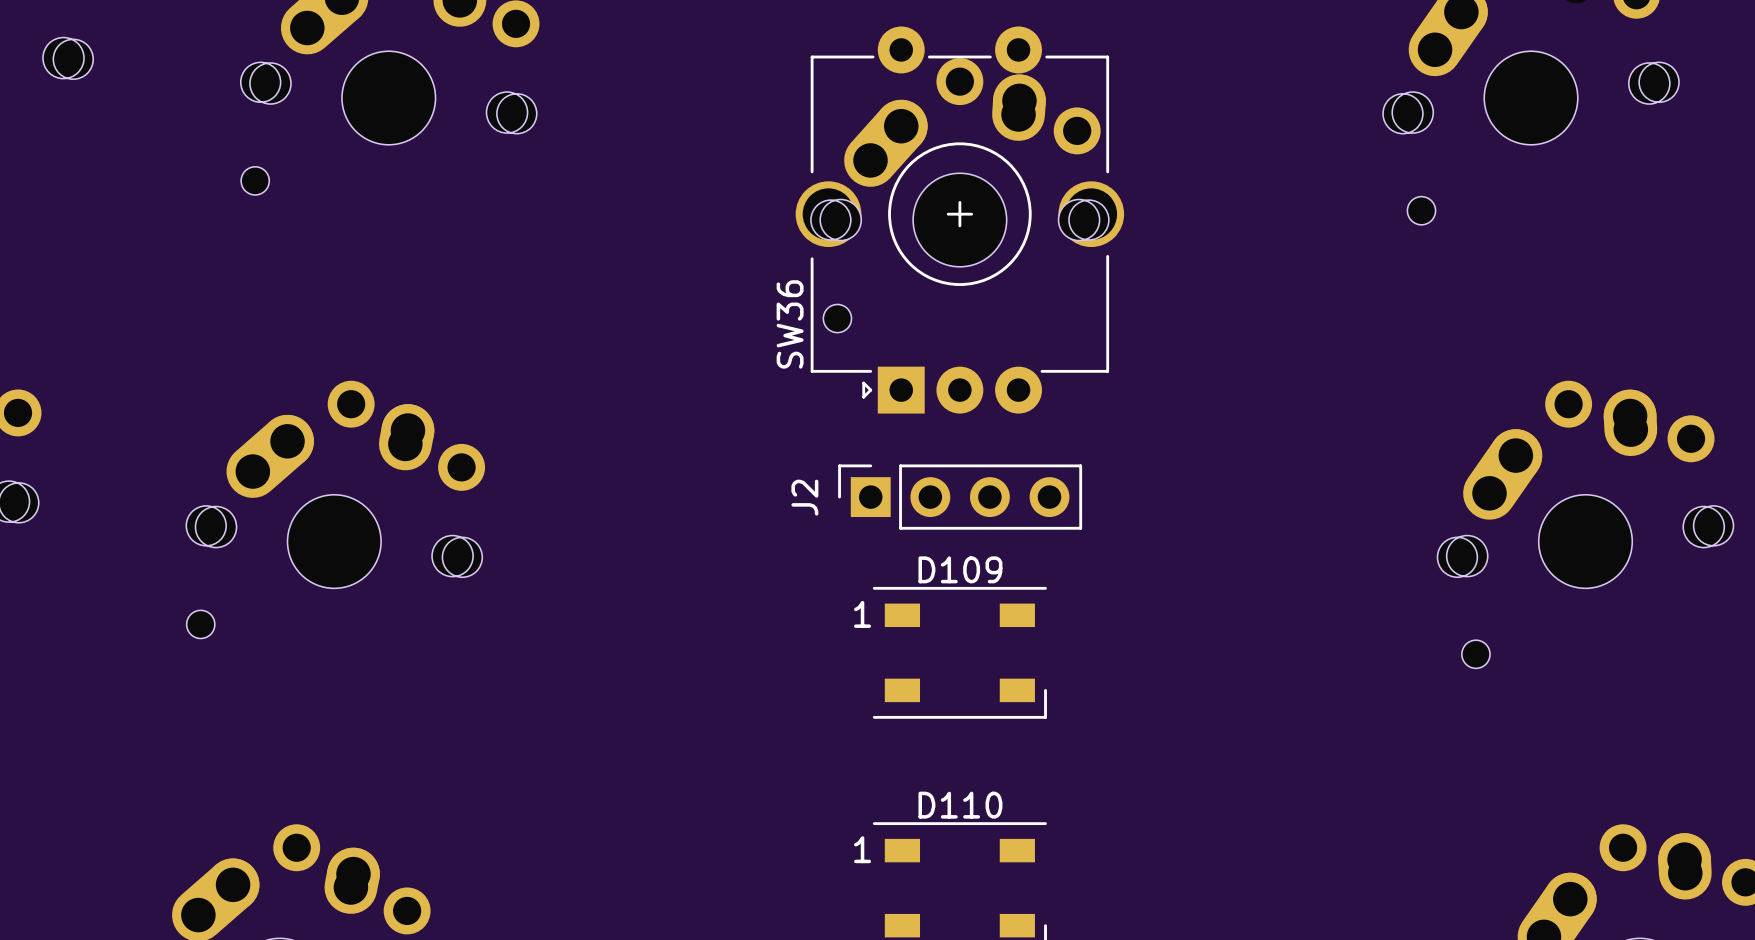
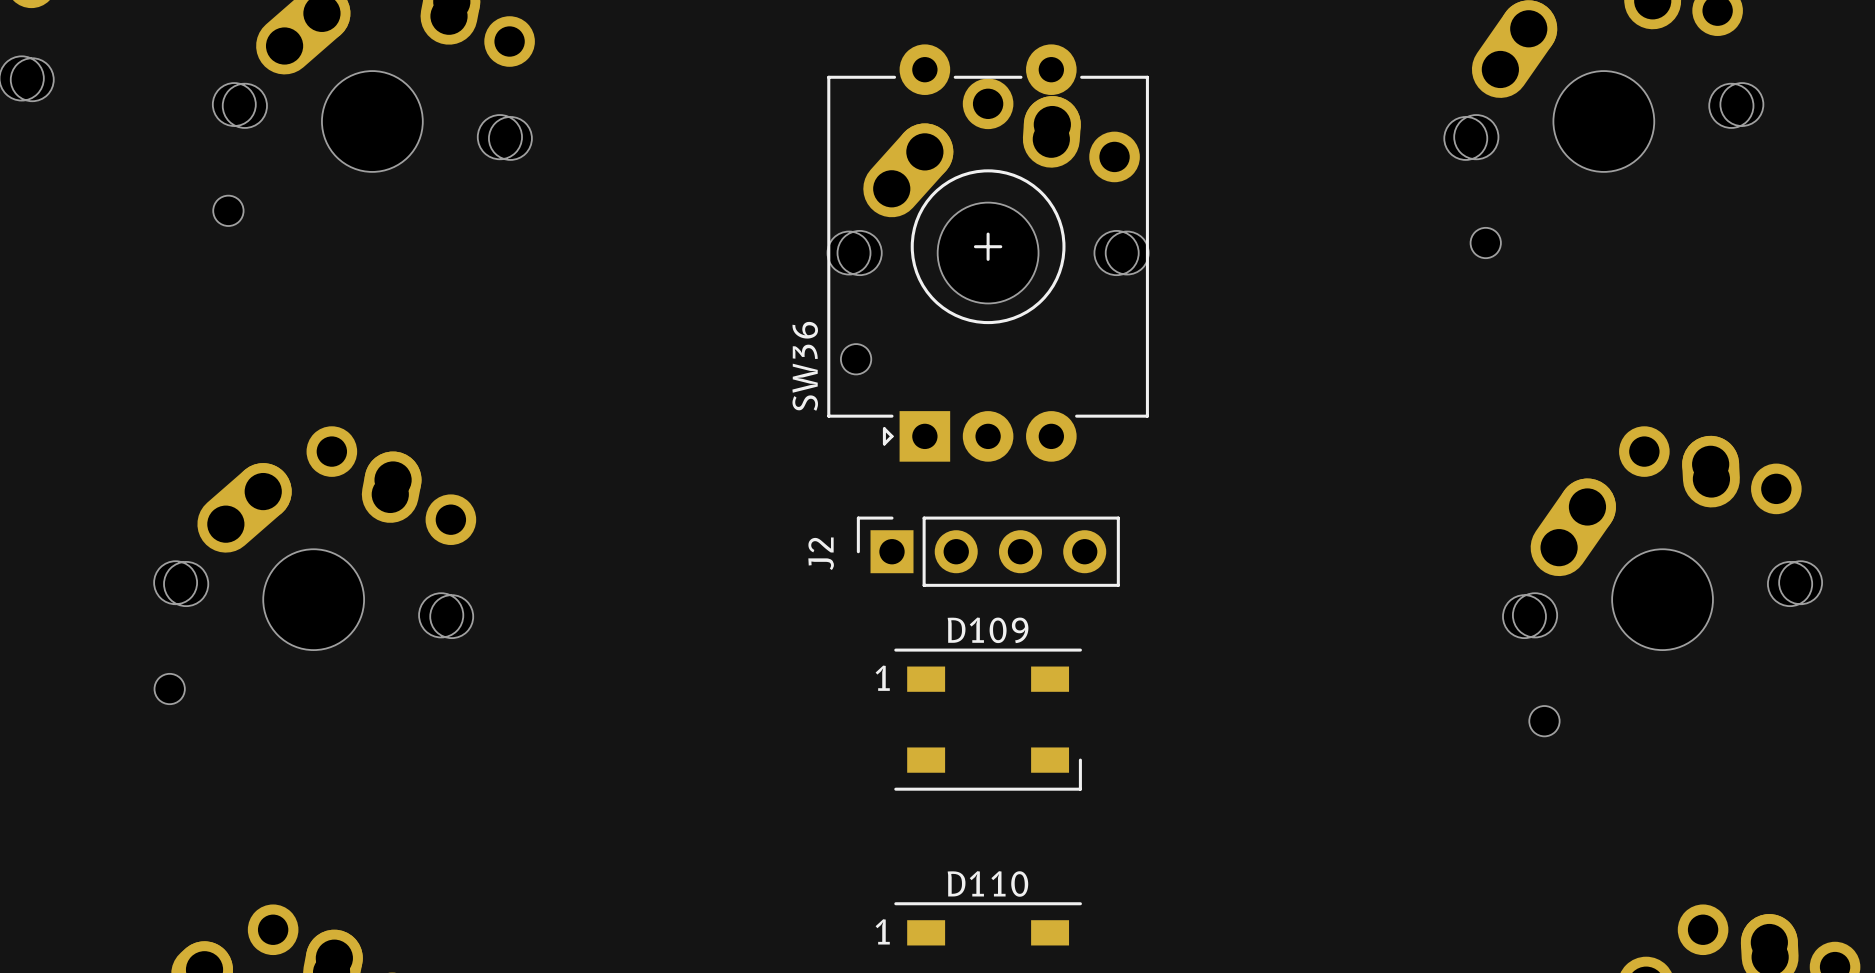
SW36 footprint: [795, 26, 1125, 414] -> [827, 44, 1149, 462]

